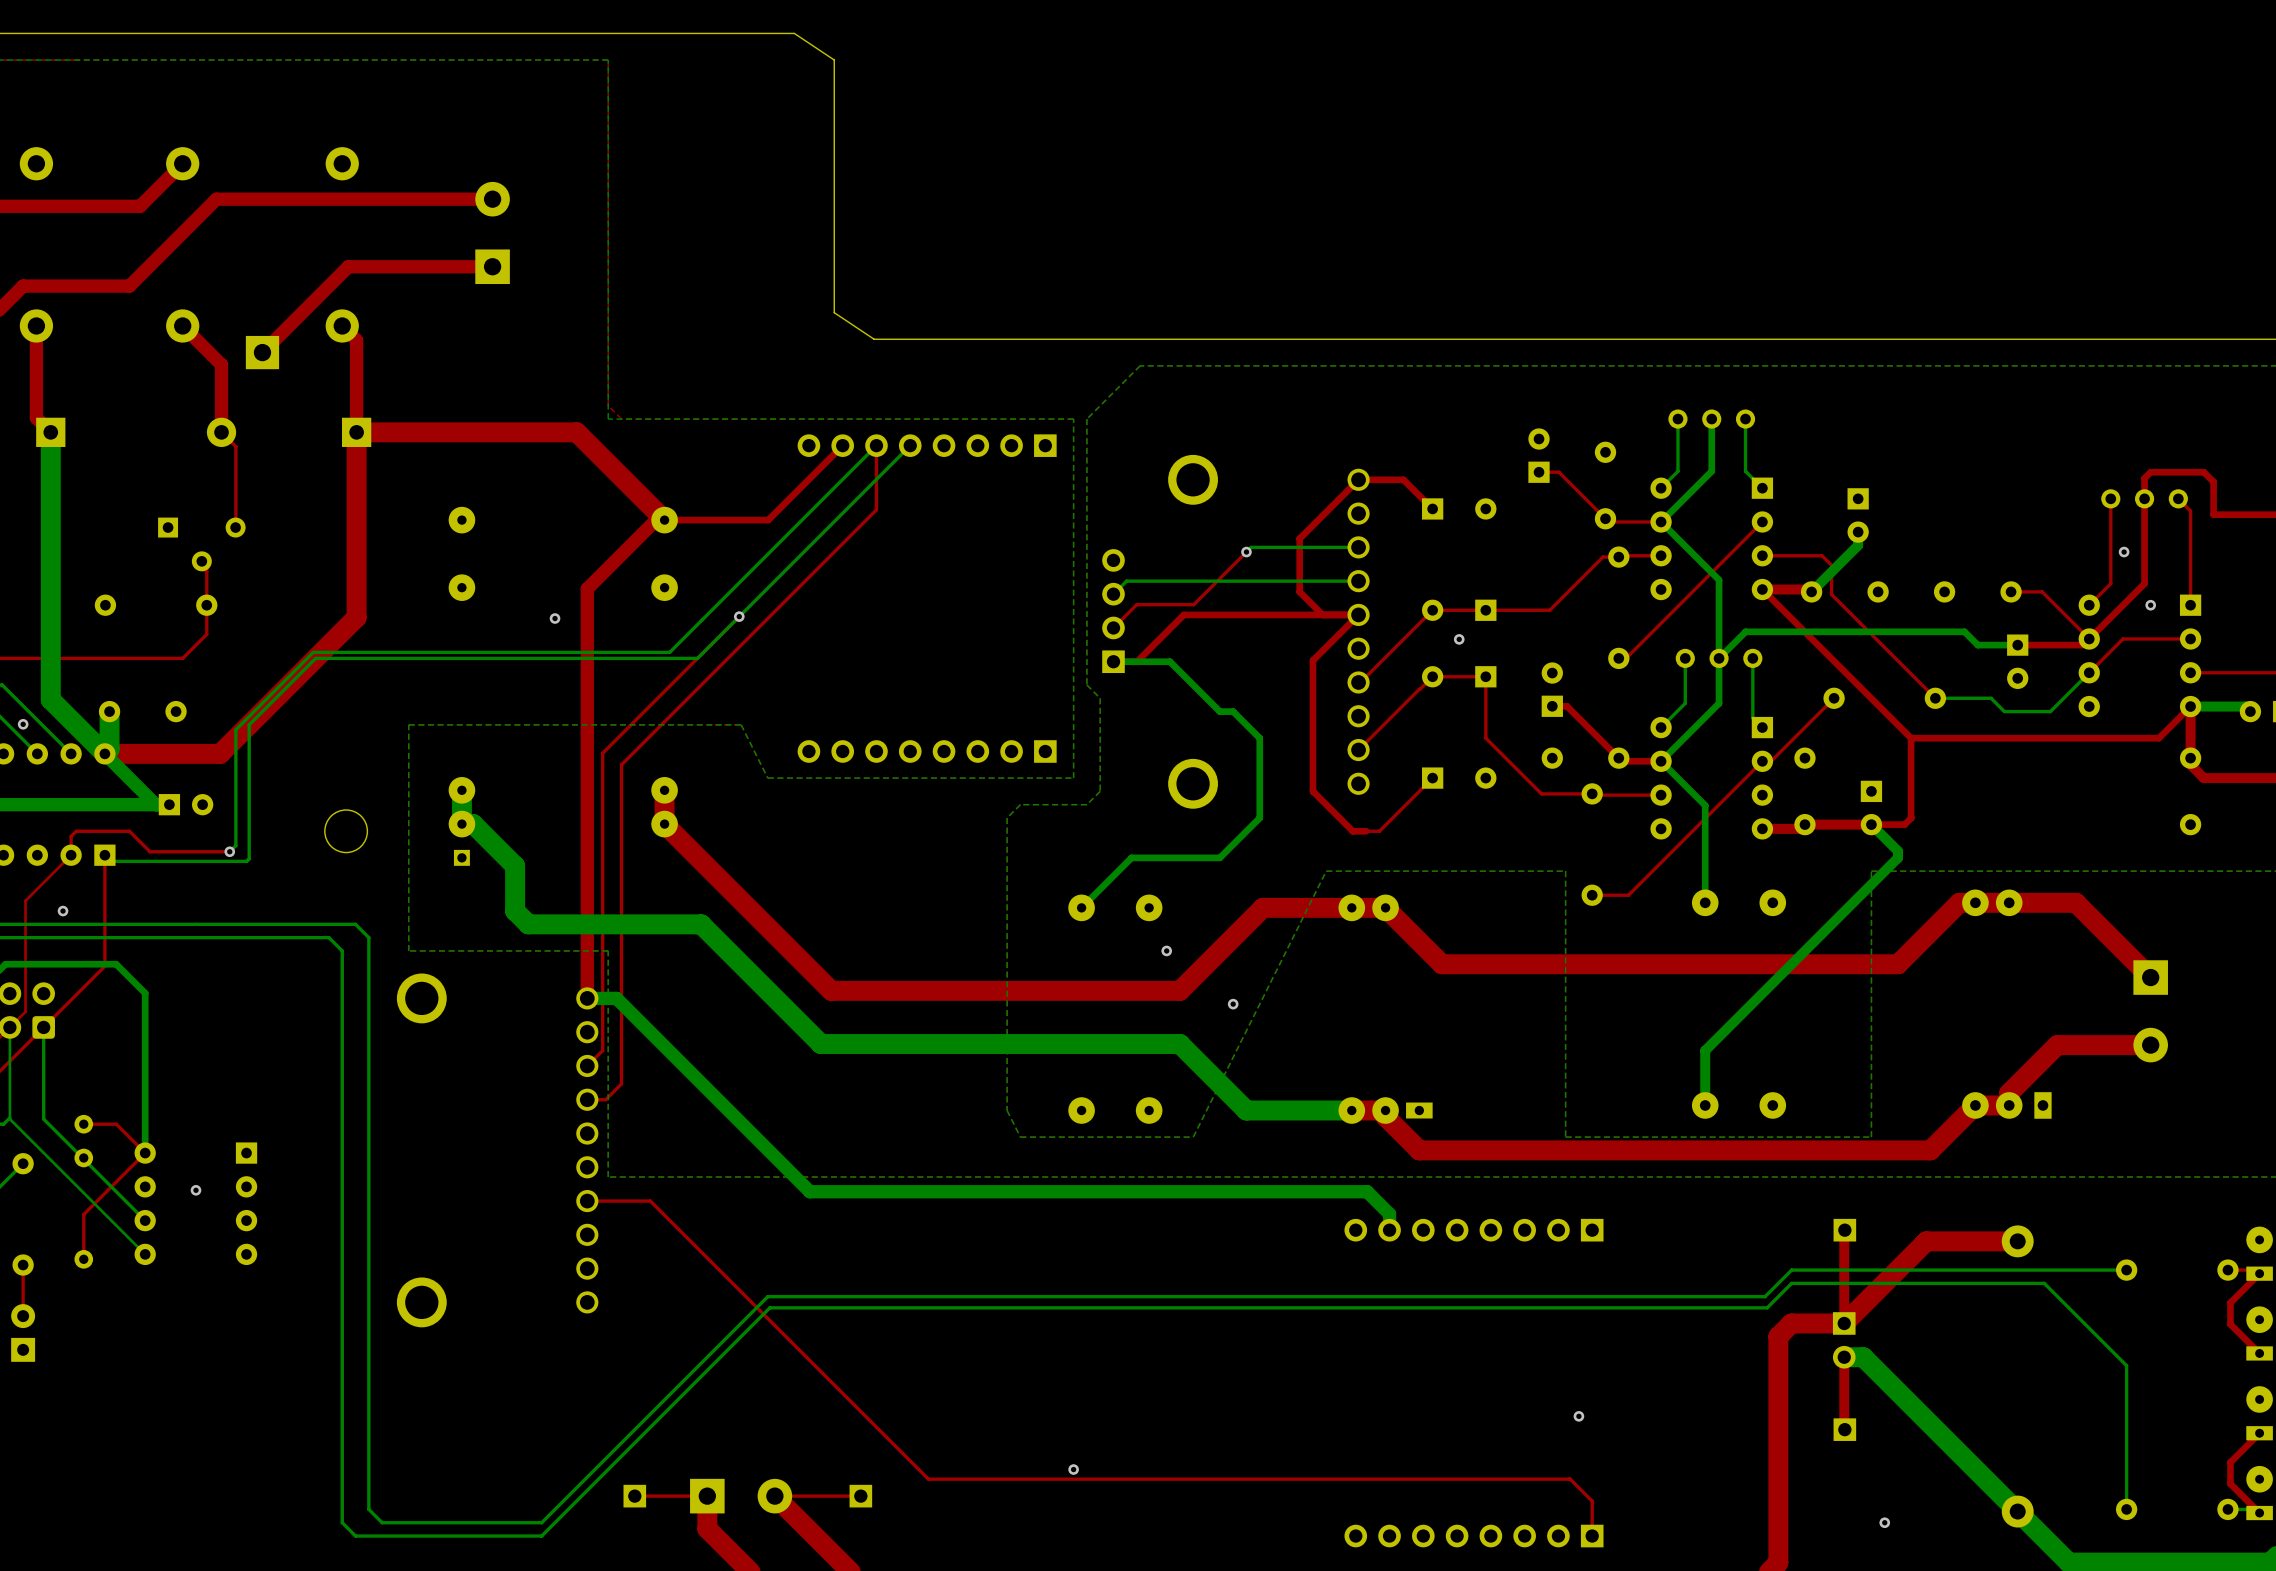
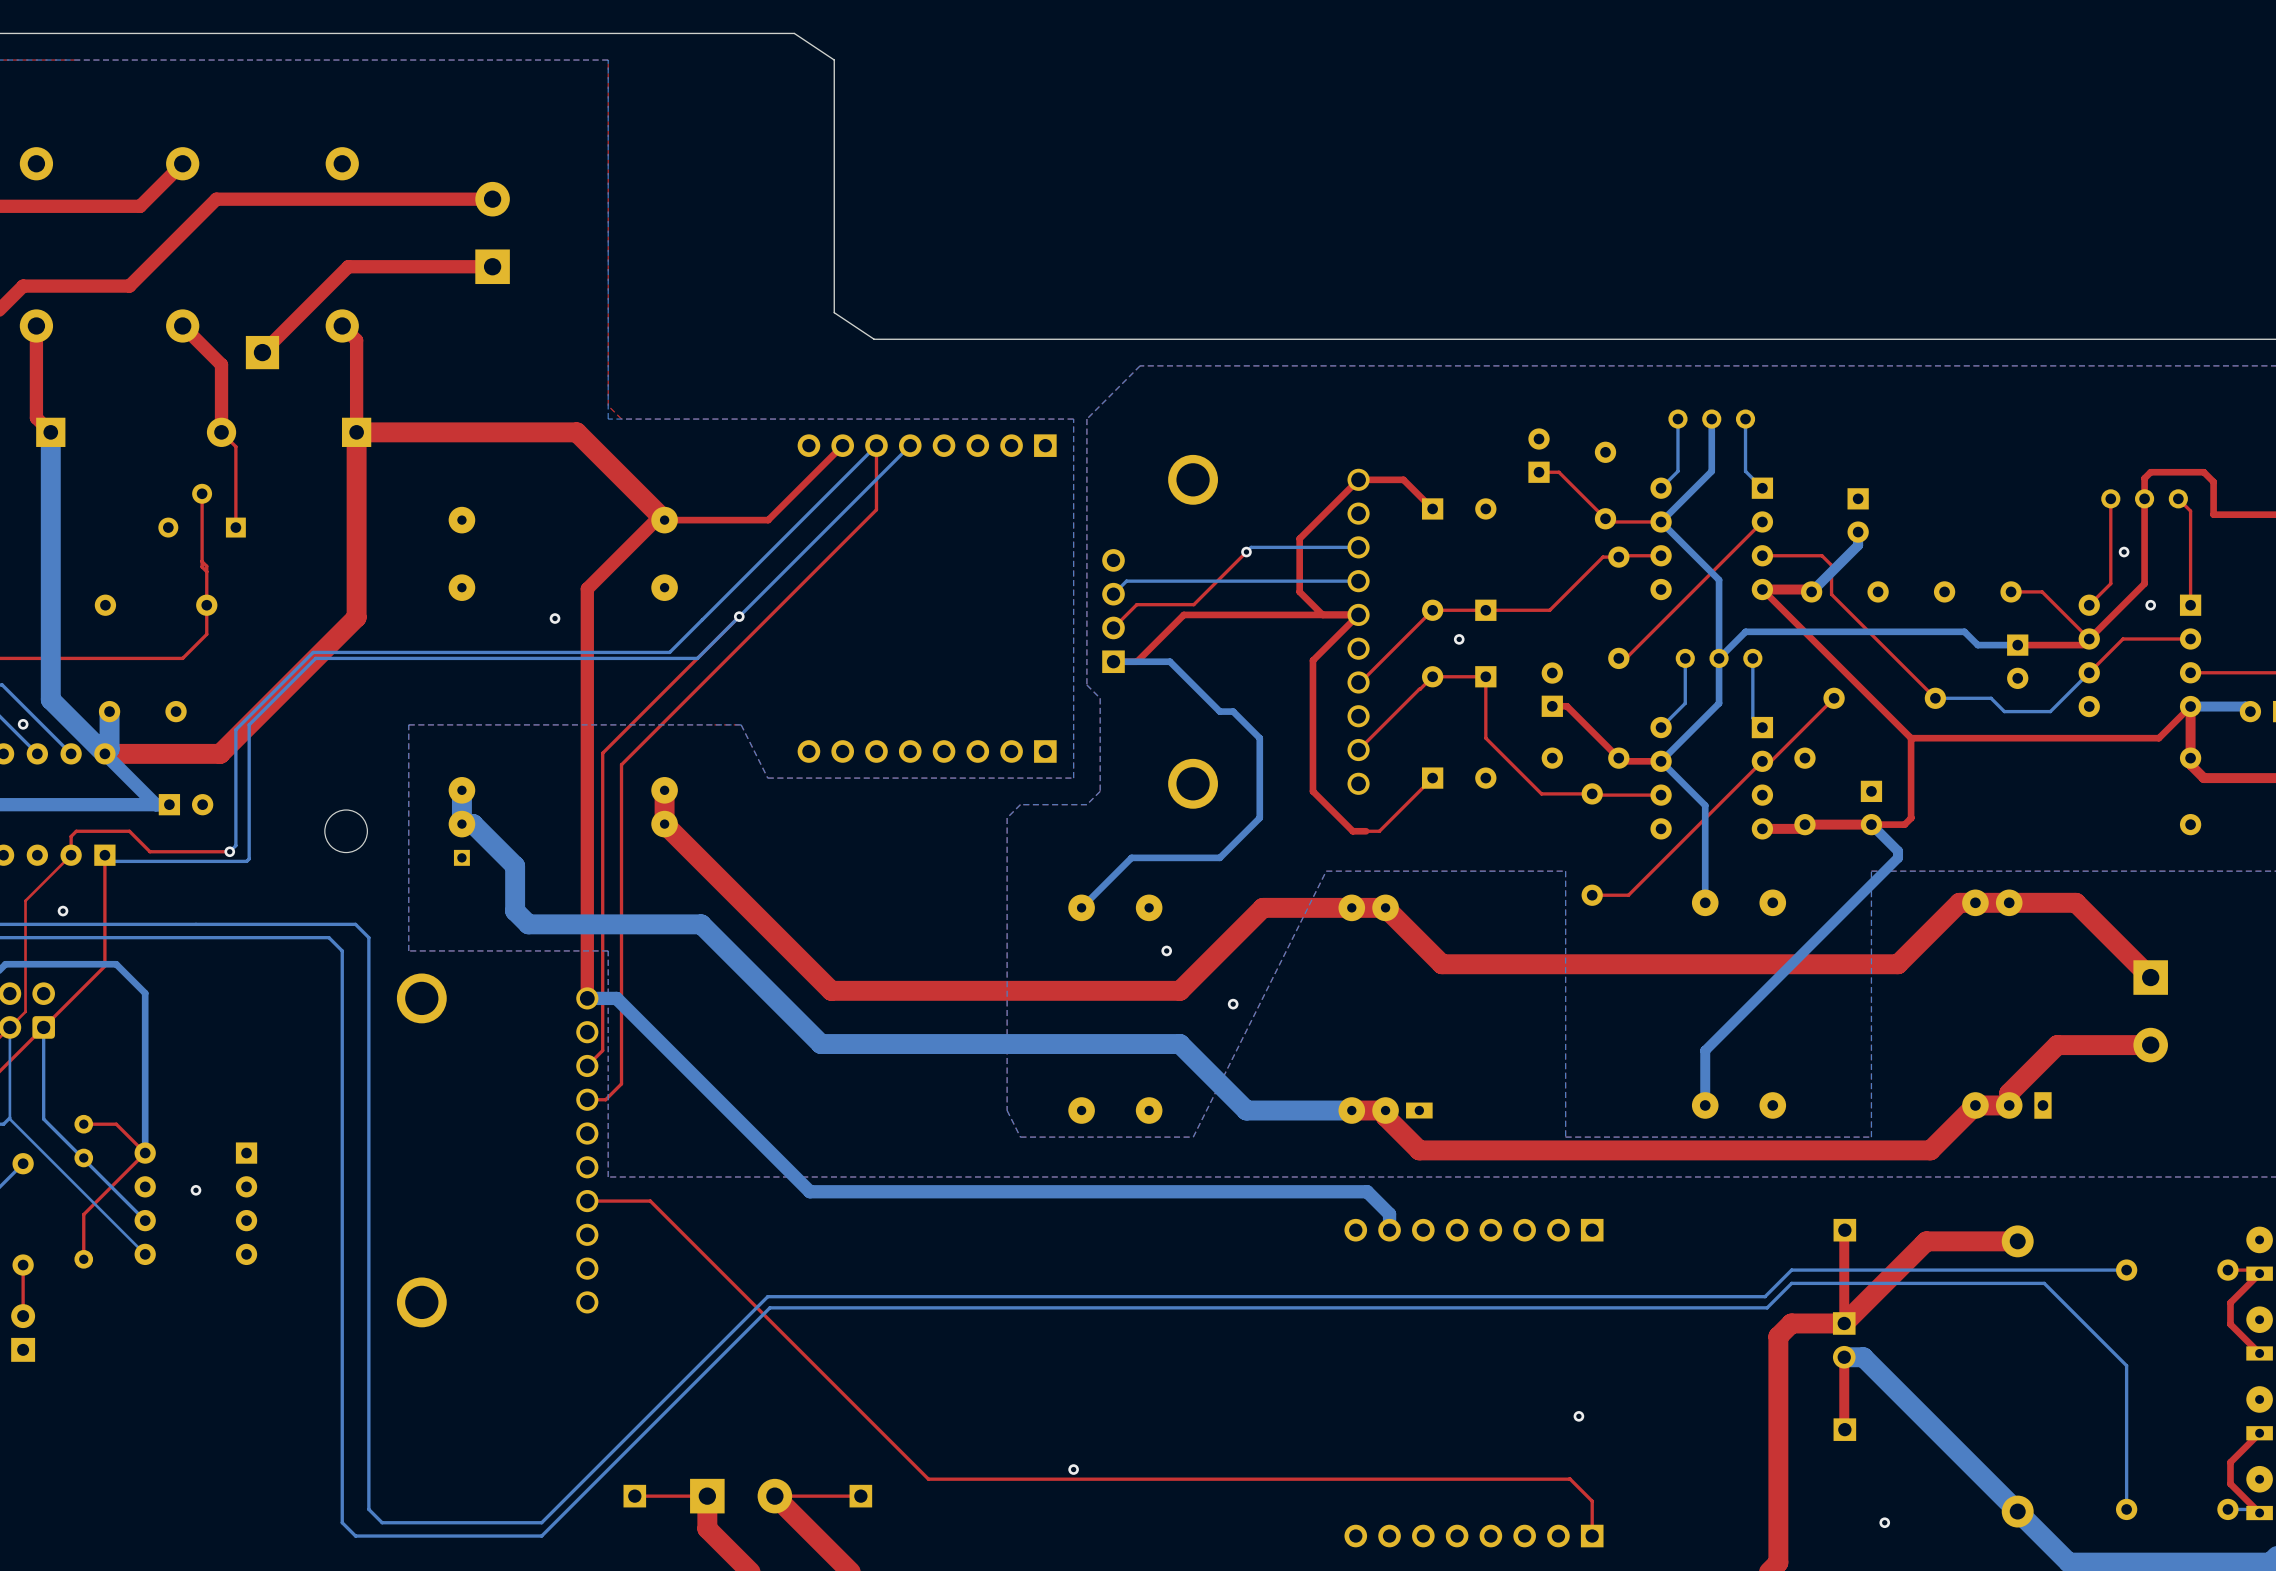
top track: none -> (202, 493) (202, 566)
part rotation: 0° (201, 544) -> 180° (202, 510)

